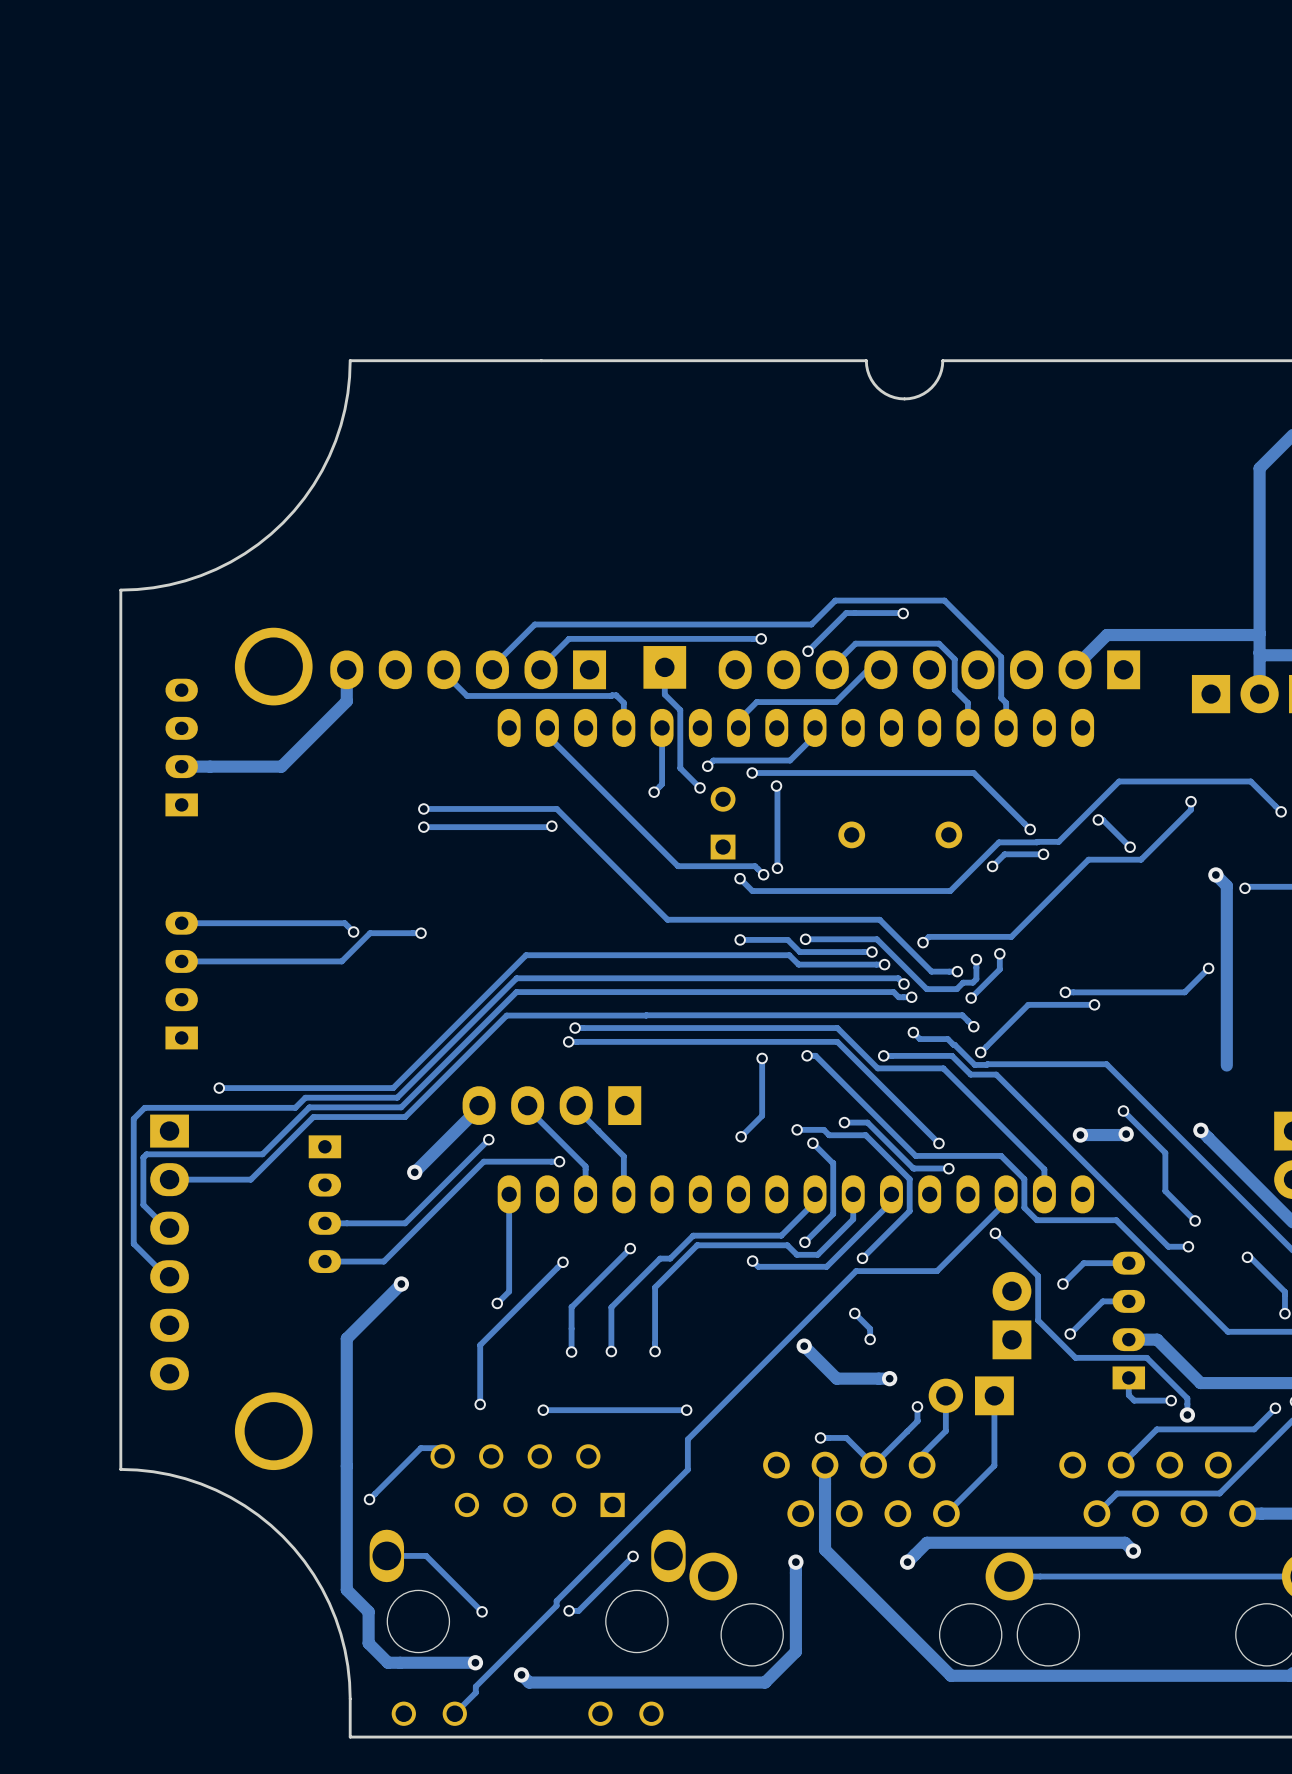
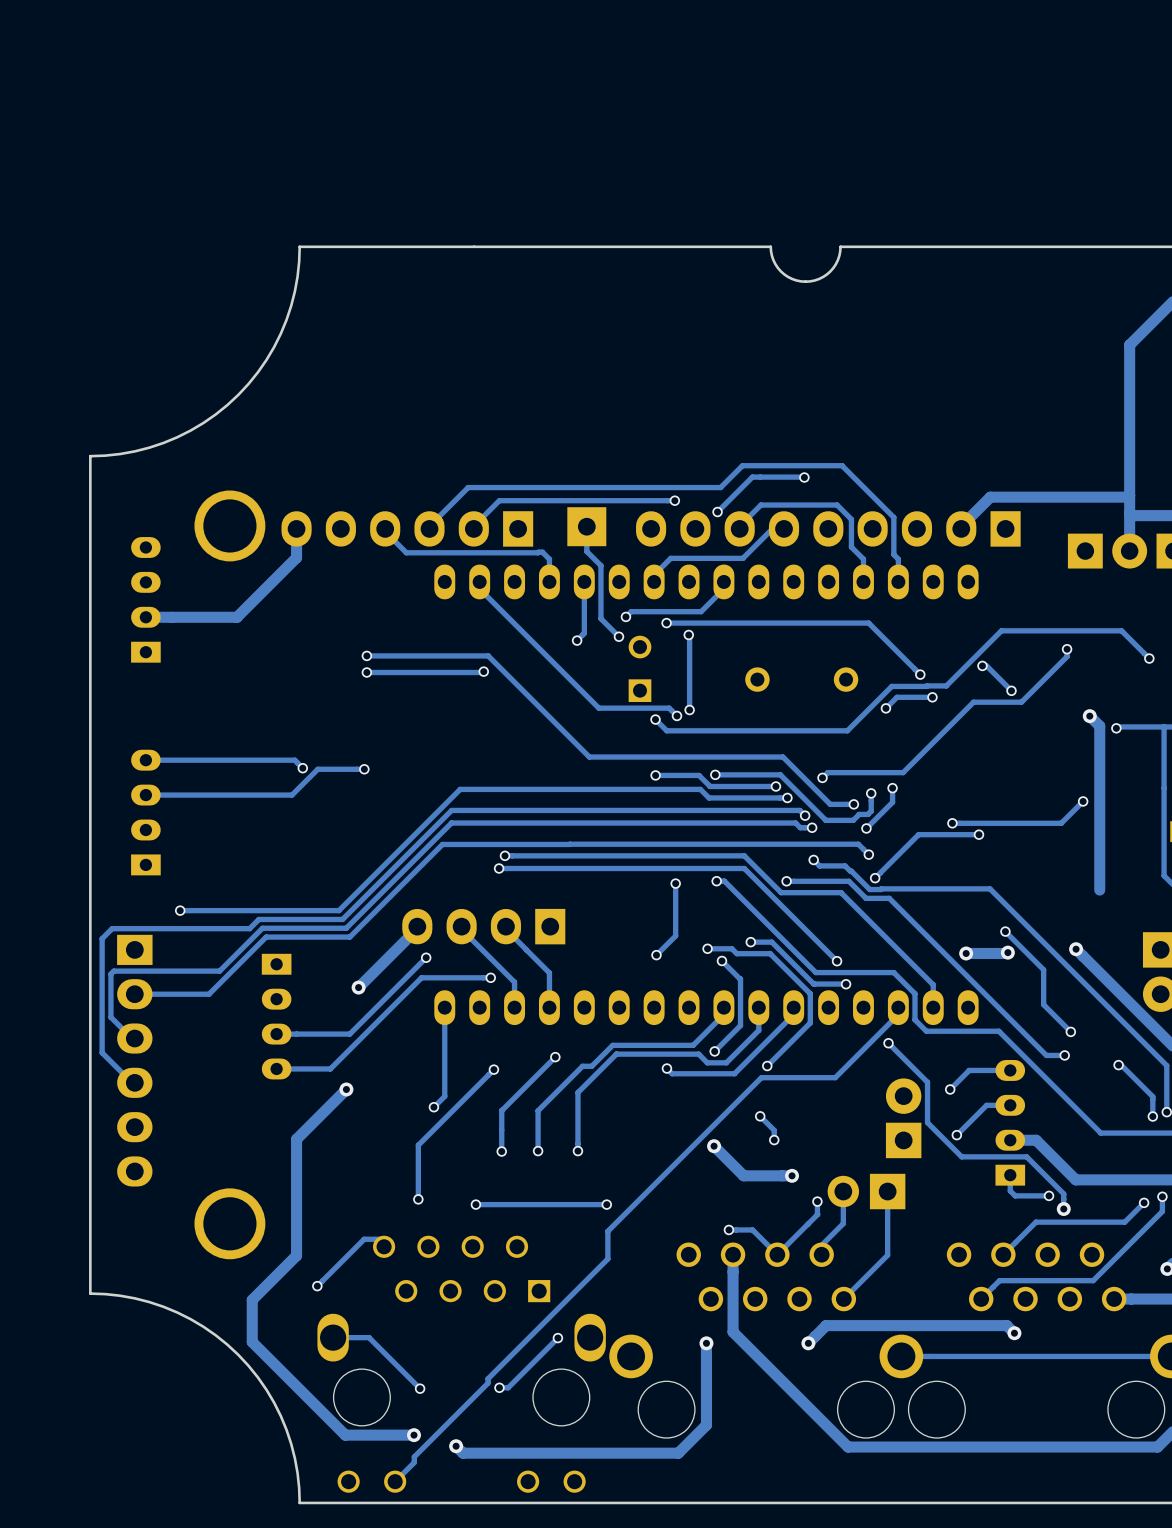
track: (346, 1466) (346, 1589) (368, 1611) (368, 1643) (388, 1662) (400, 1662) -> (296, 1255) (252, 1299) (252, 1342) (345, 1435)
board edge: (120, 1469) (169, 1474) (216, 1490) (258, 1515) (294, 1548) (322, 1588) (340, 1634) (349, 1682) (350, 1737) -> (90, 1258) (90, 1293) (134, 1298) (177, 1312) (215, 1335) (248, 1365) (266, 1389) (286, 1429) (294, 1458) (299, 1502)

